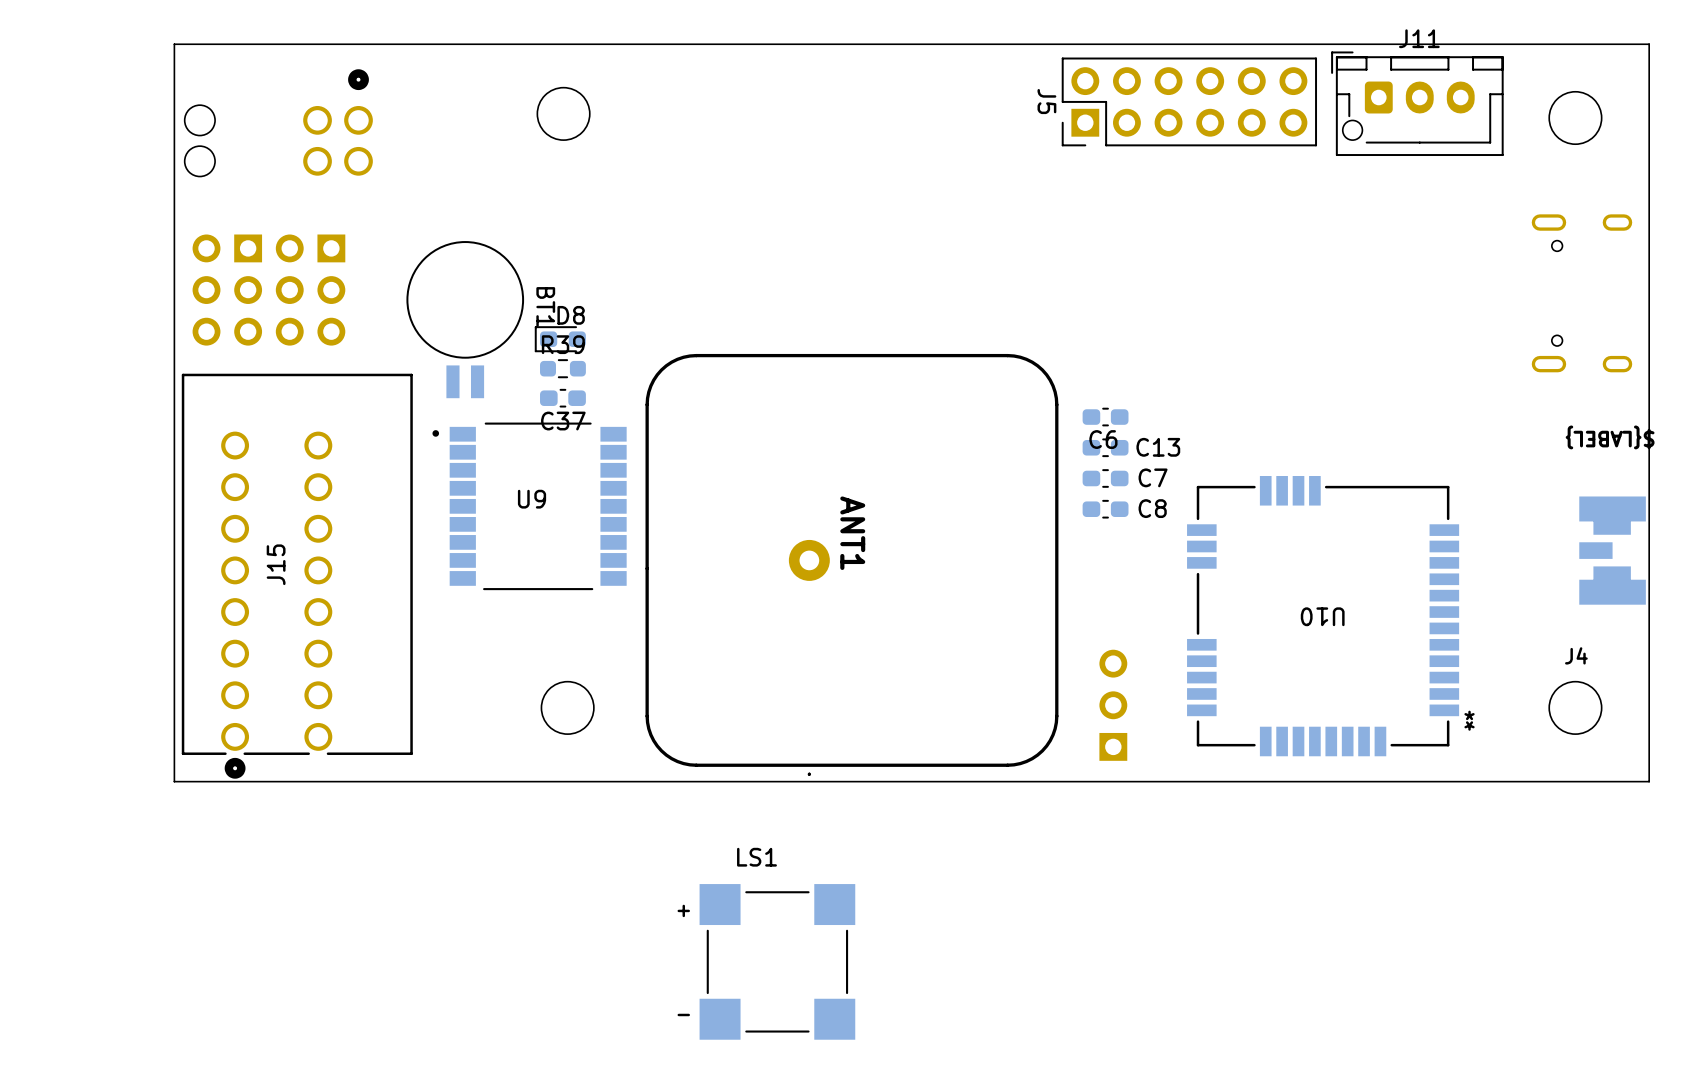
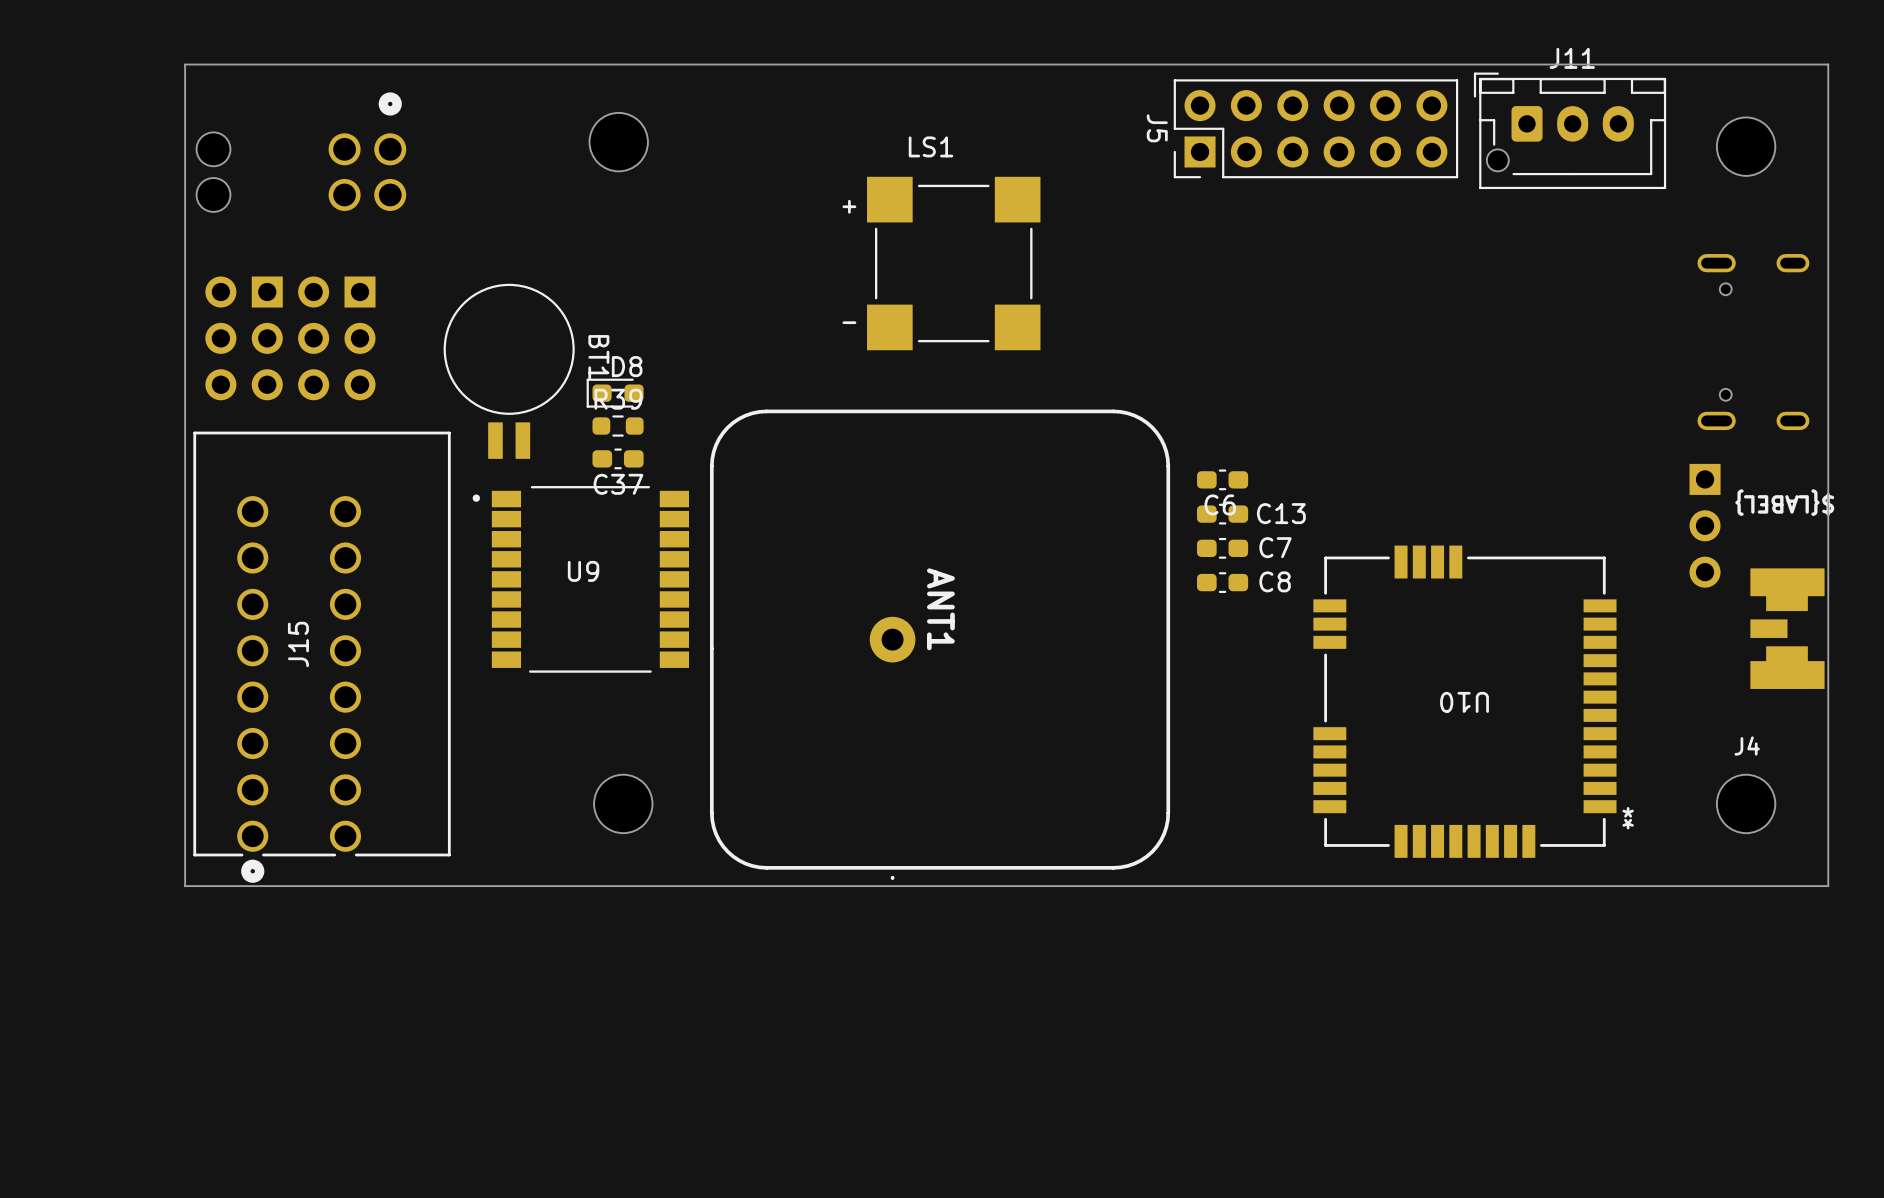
part: none -> (1705, 525)
part: (1113, 705) -> none
LS1 position: (777, 961) -> (953, 263)

